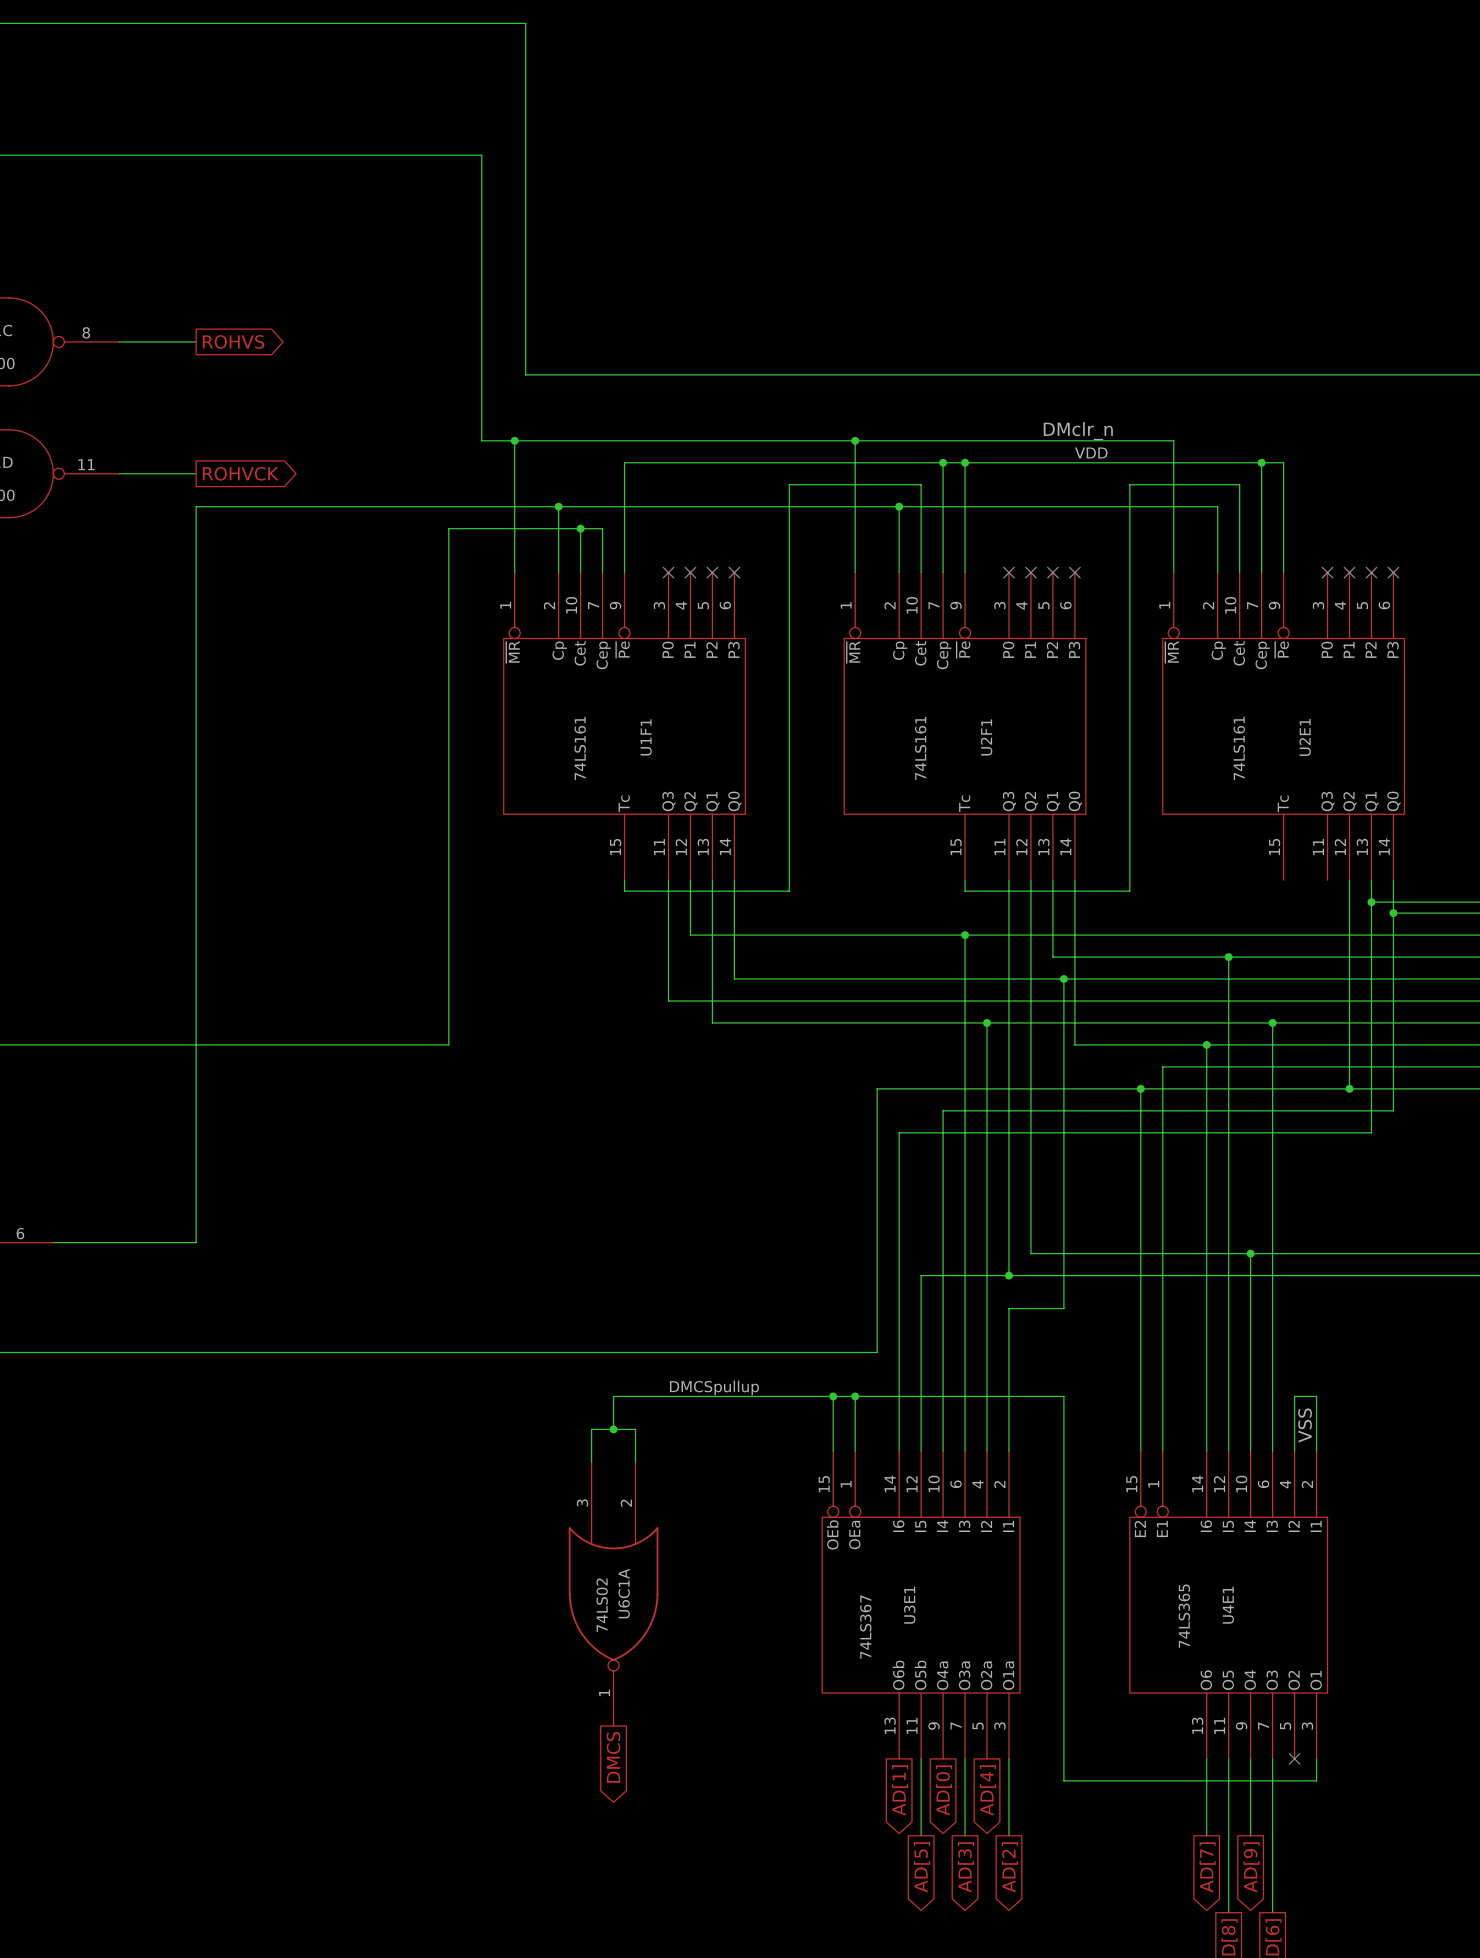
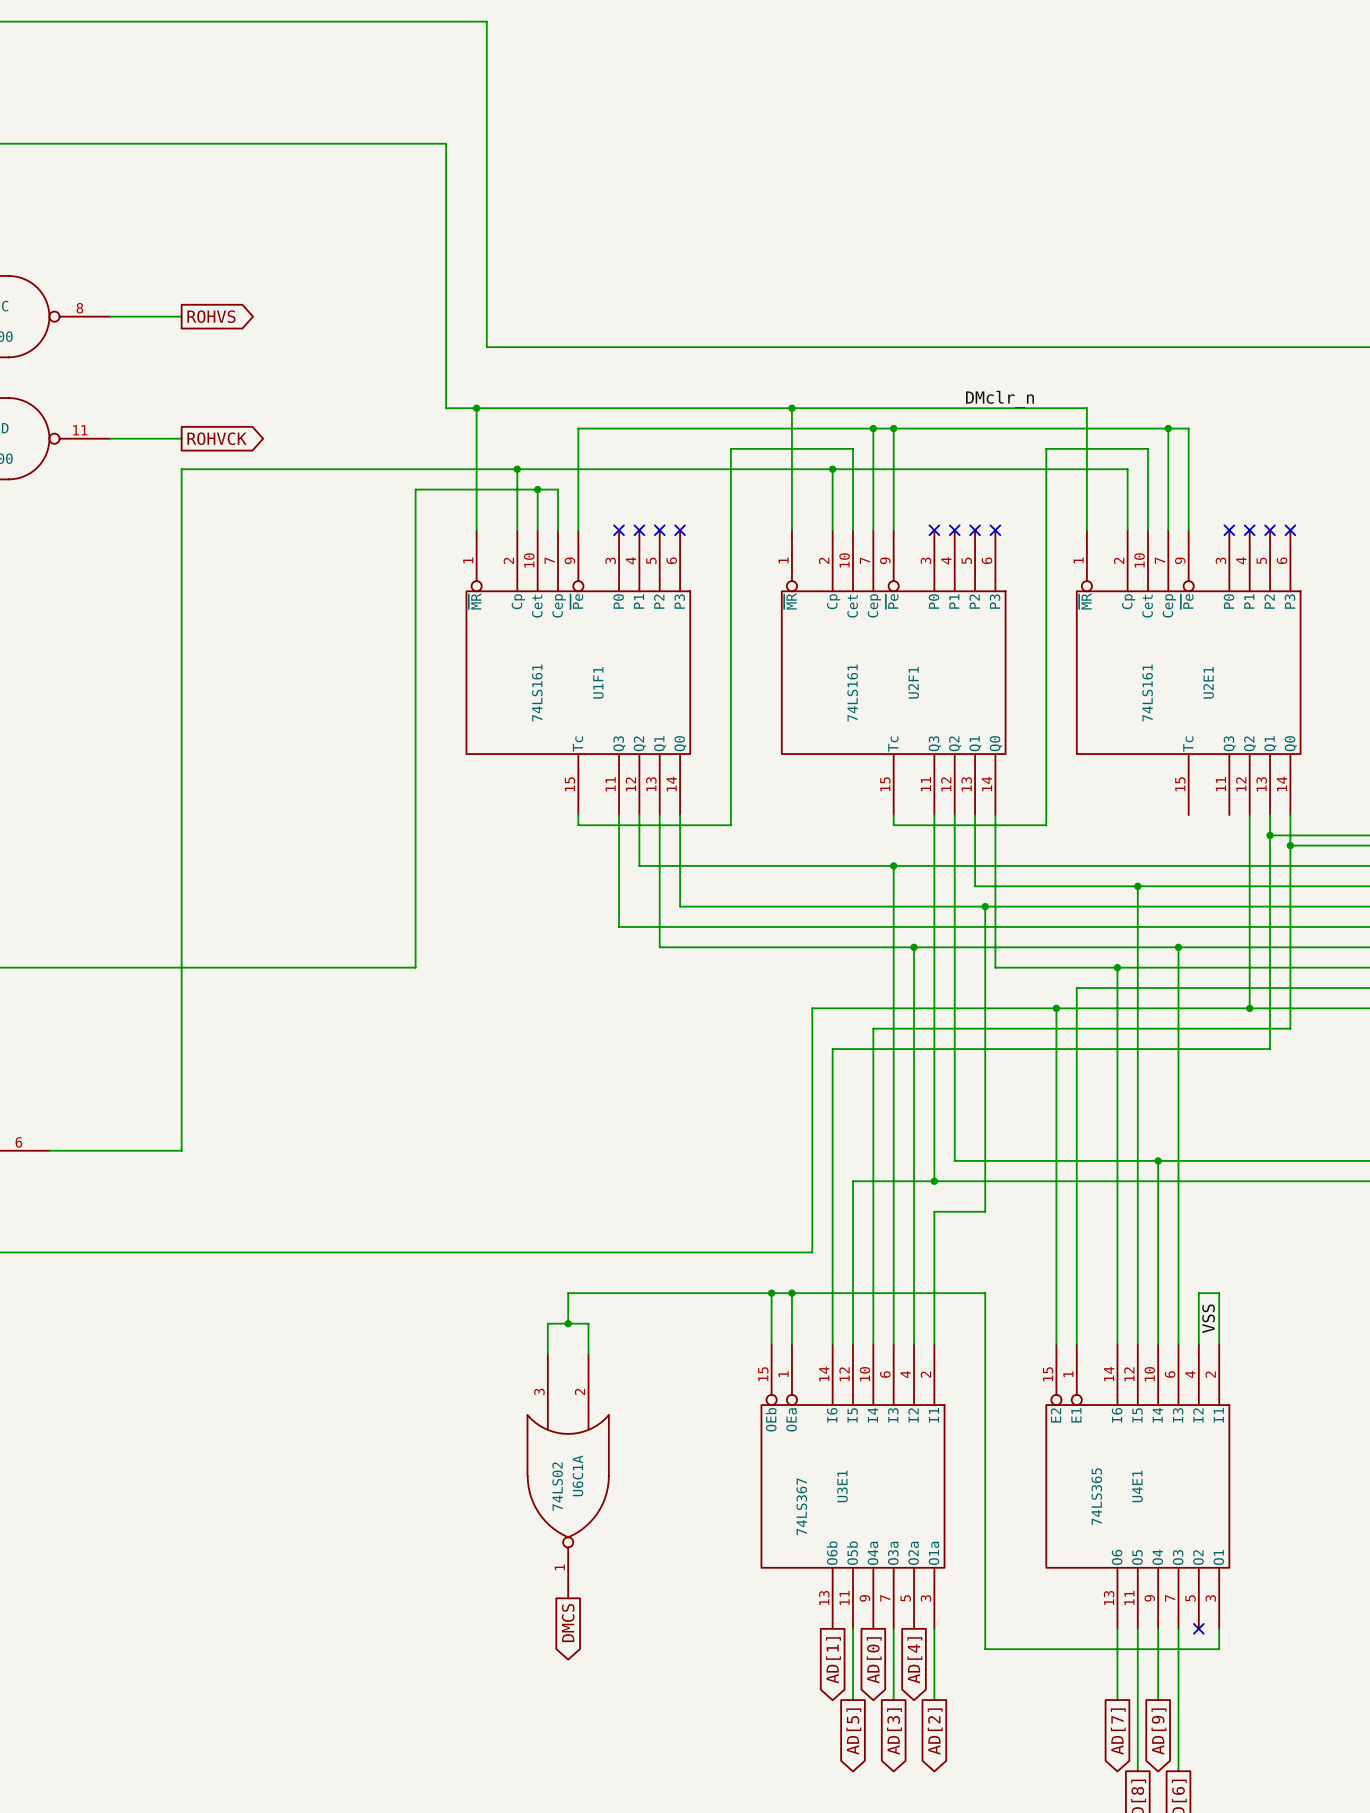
label: VDD (1091, 452) -> none
label: DMCSpullup (714, 1387) -> none

